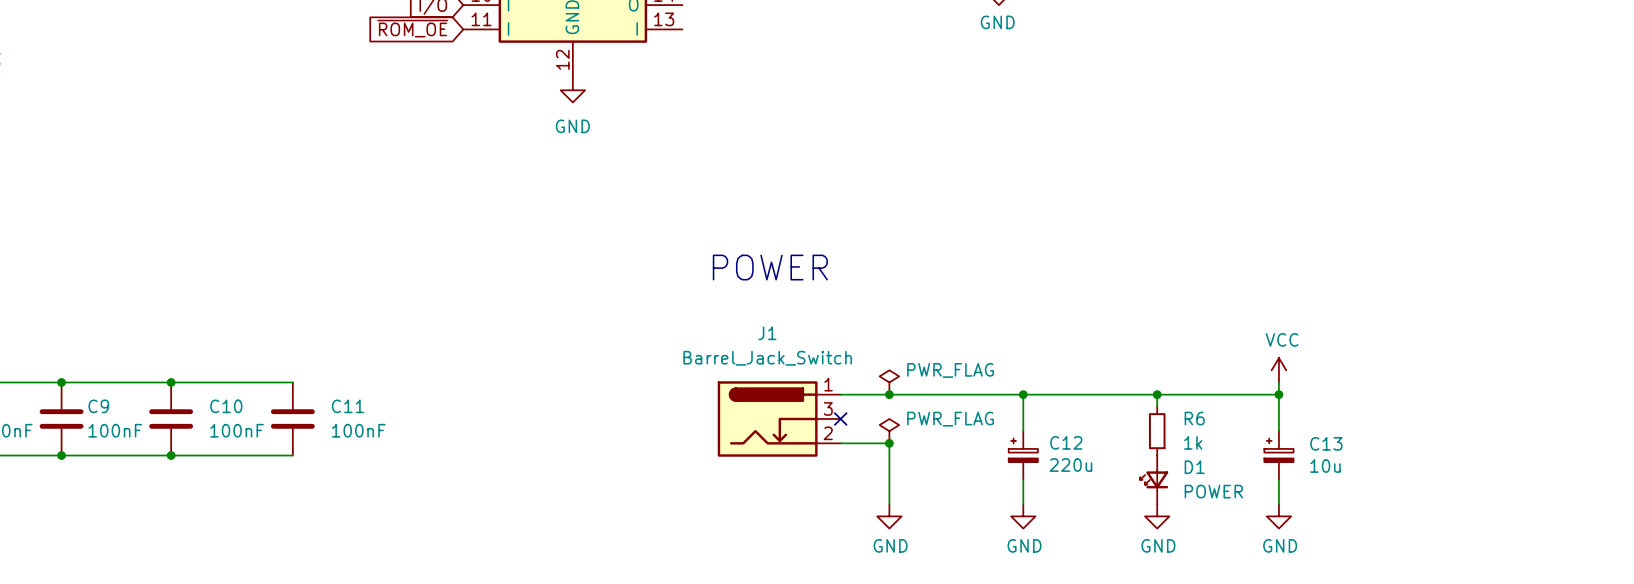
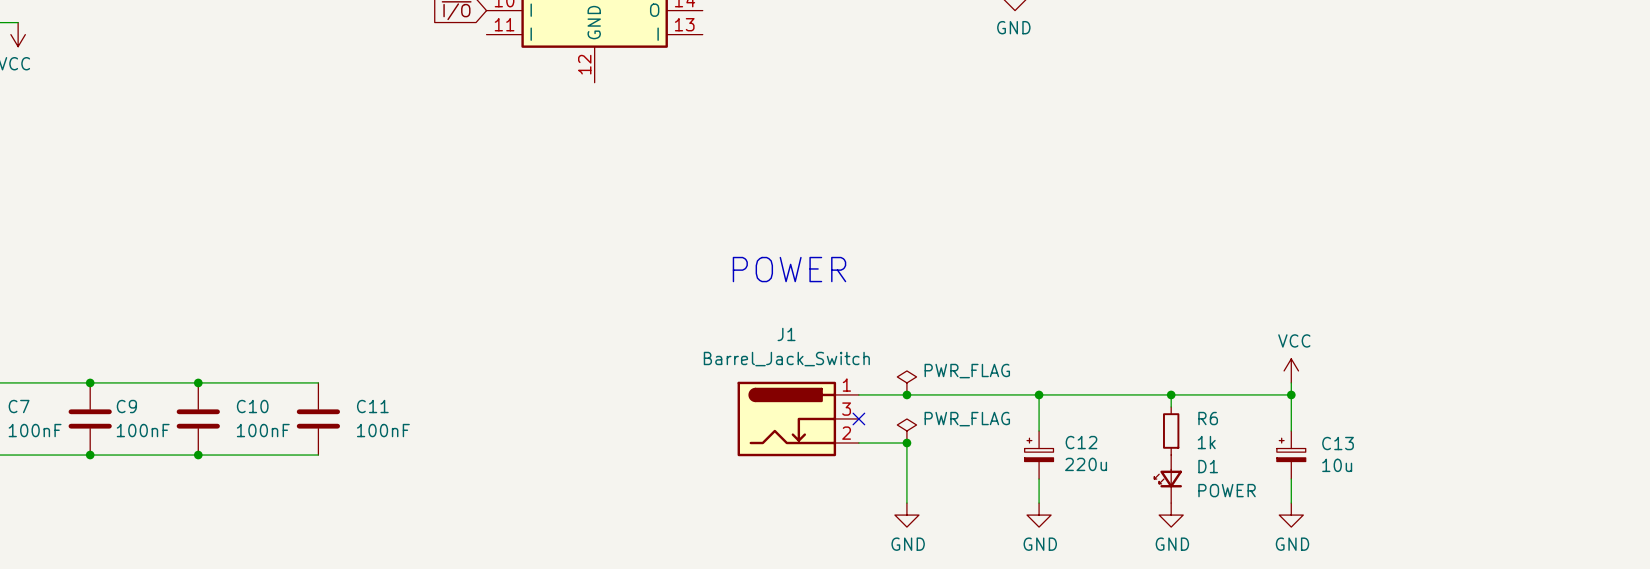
global label: ~{ROM_OE} (412, 28) -> none
power symbol: GND (572, 90) -> none

